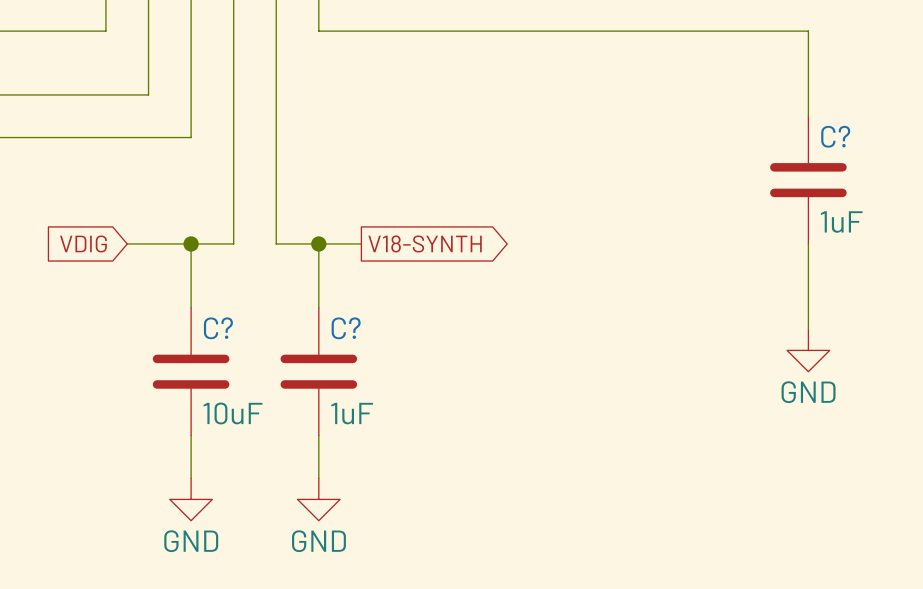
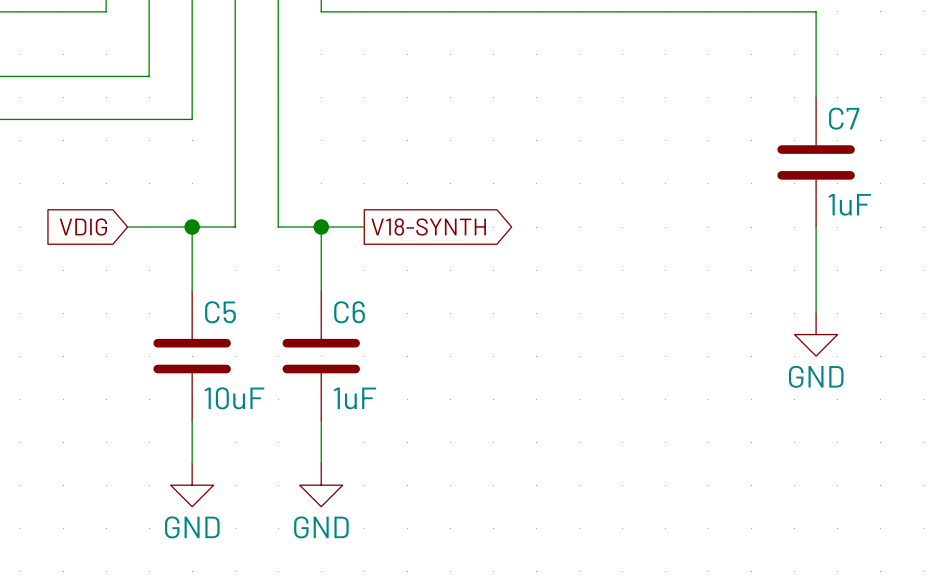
C? name: C? (835, 136) -> C7 (844, 118)
C? name: C? (218, 328) -> C5 (220, 312)
C? name: C? (346, 328) -> C6 (349, 312)

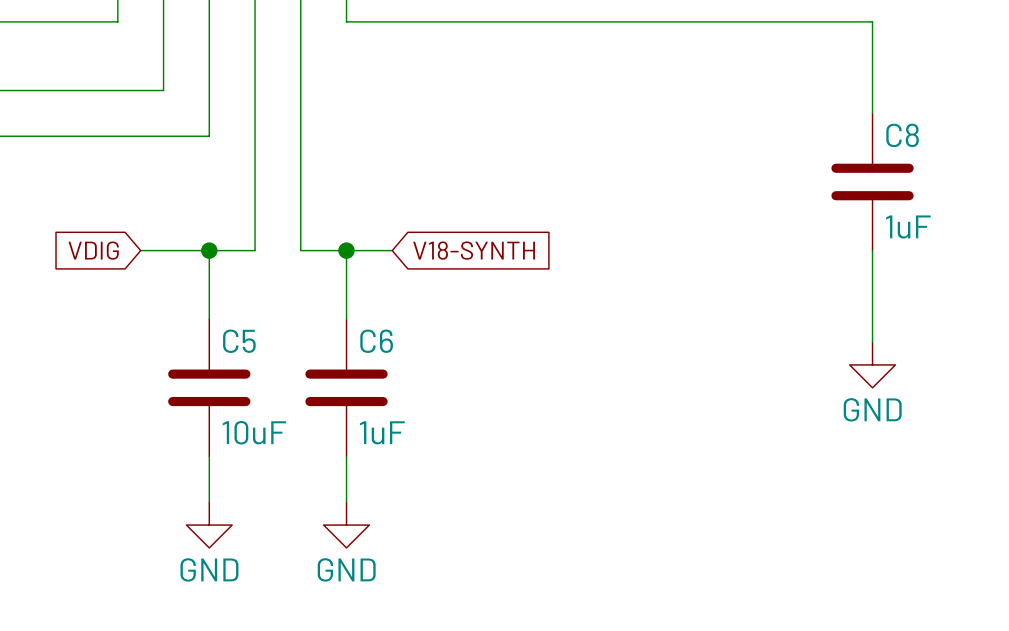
C7 name: C7 (844, 118) -> C8 (902, 135)
global label shape: output (428, 226) -> input (474, 250)

